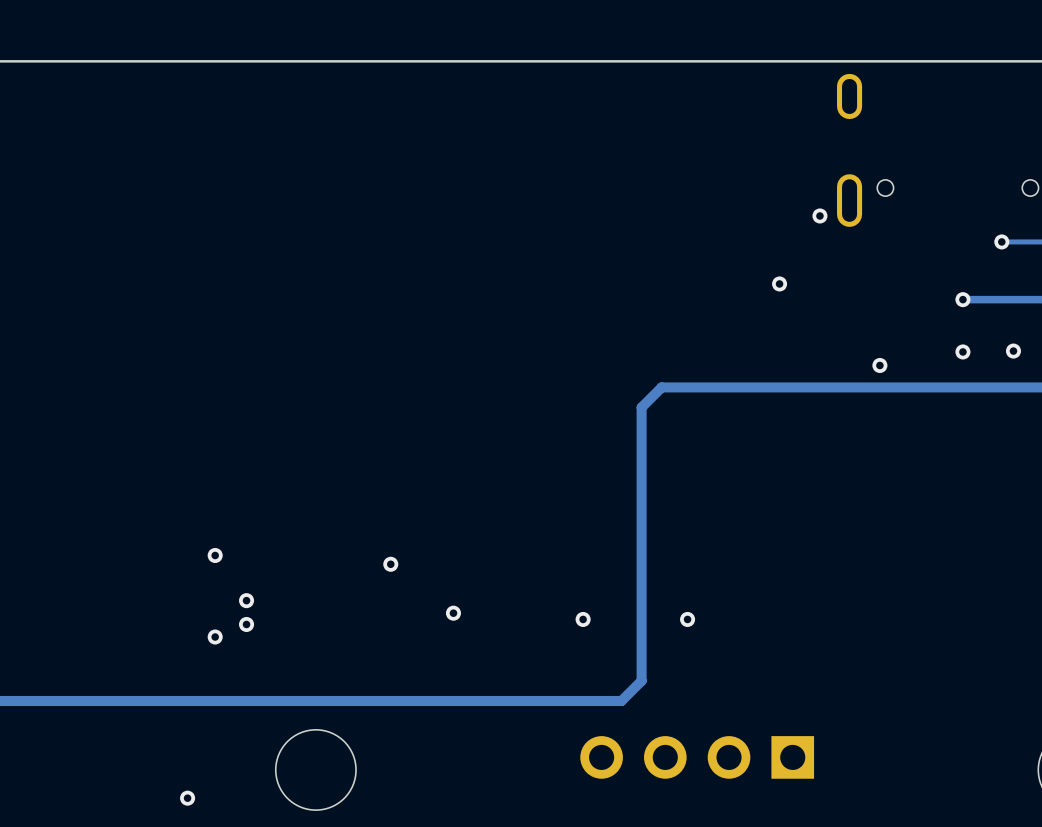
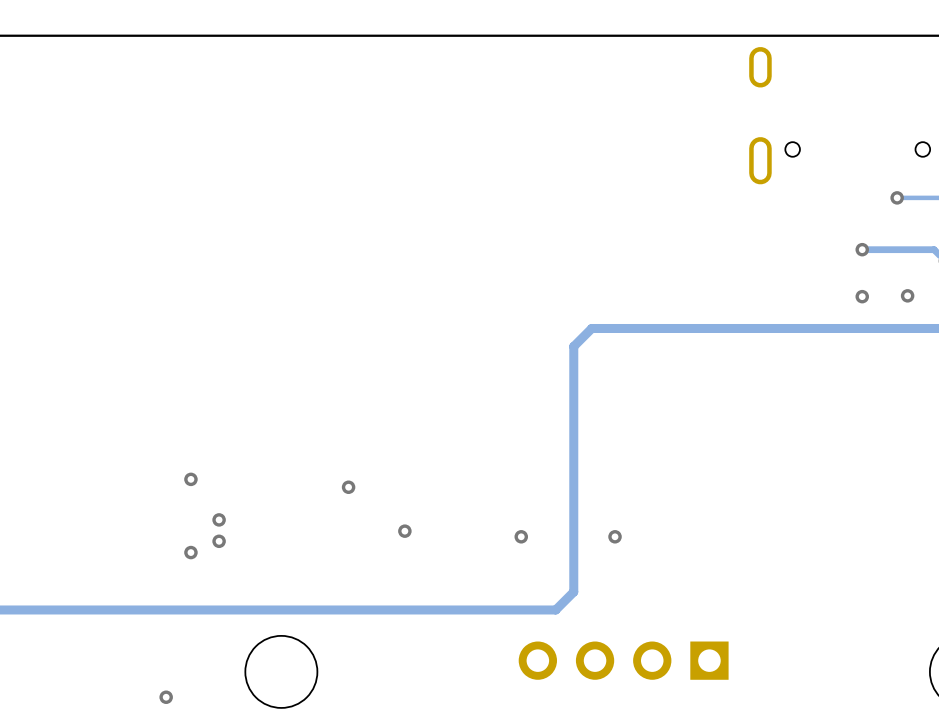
via: (819, 215) -> none
via: (779, 283) -> none
via: (879, 365) -> none

